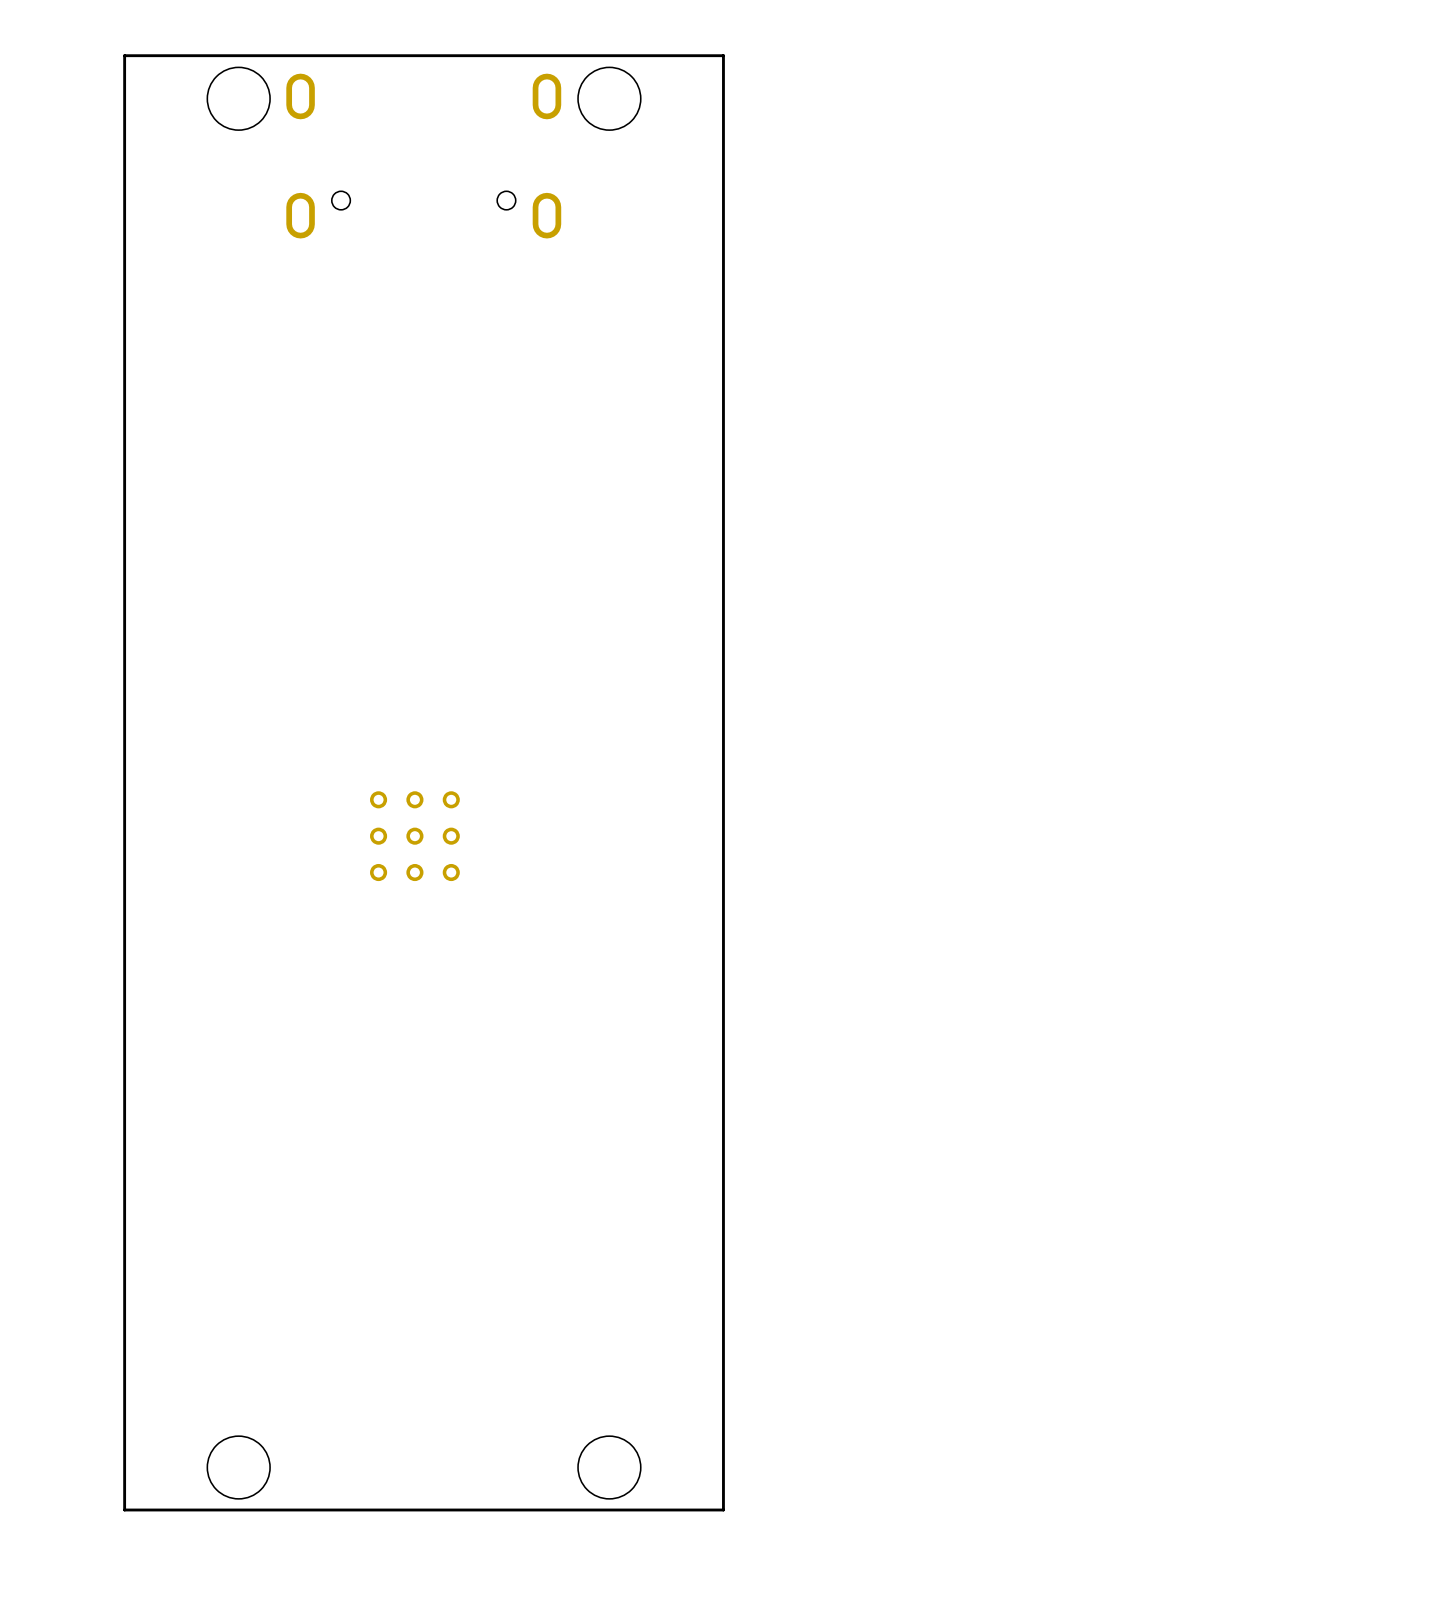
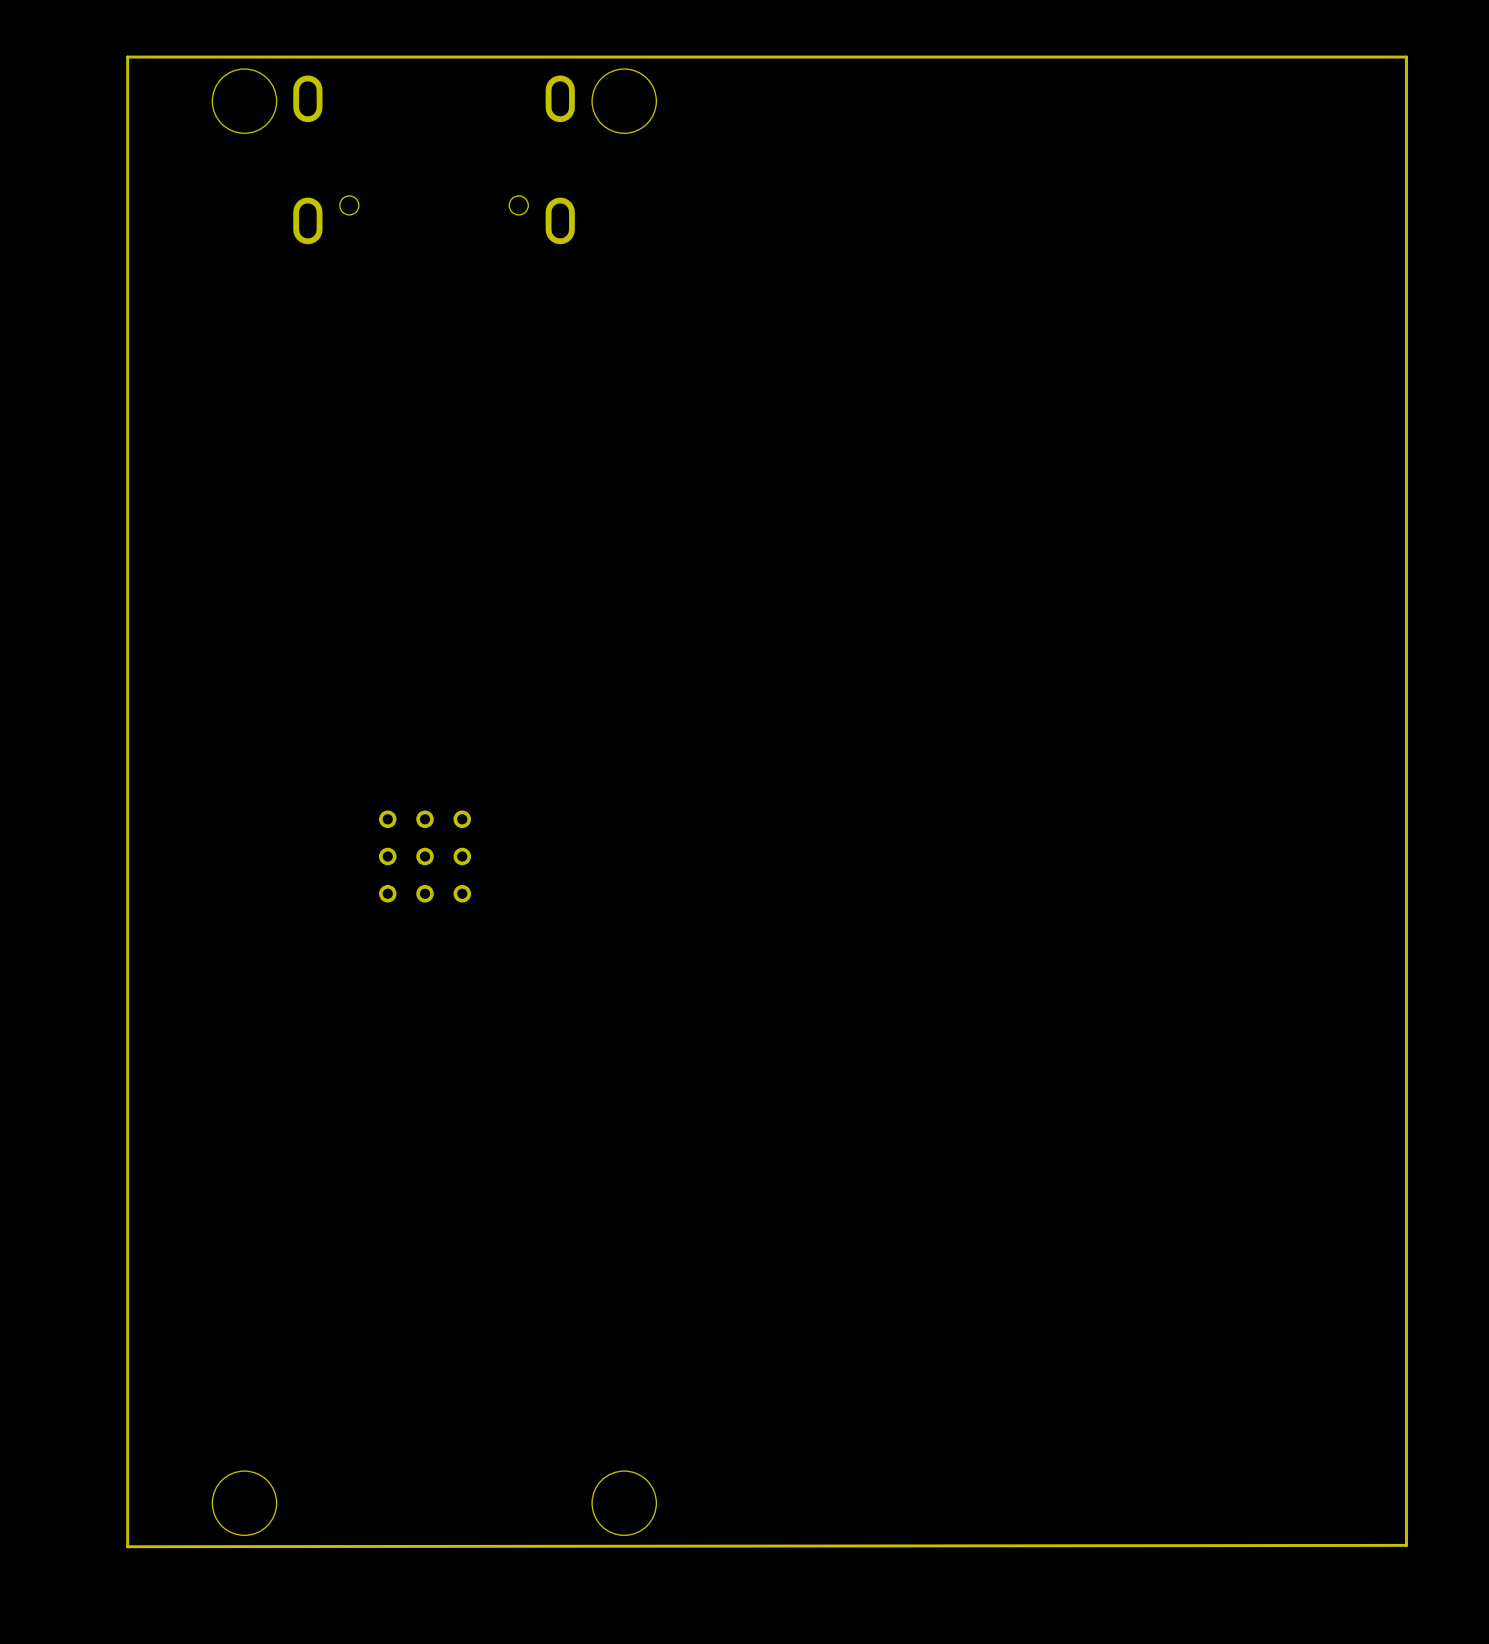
board edge: (723, 55) (723, 1510) (124, 1510) -> (741, 57) (1406, 57) (1406, 1545) (127, 1546)

